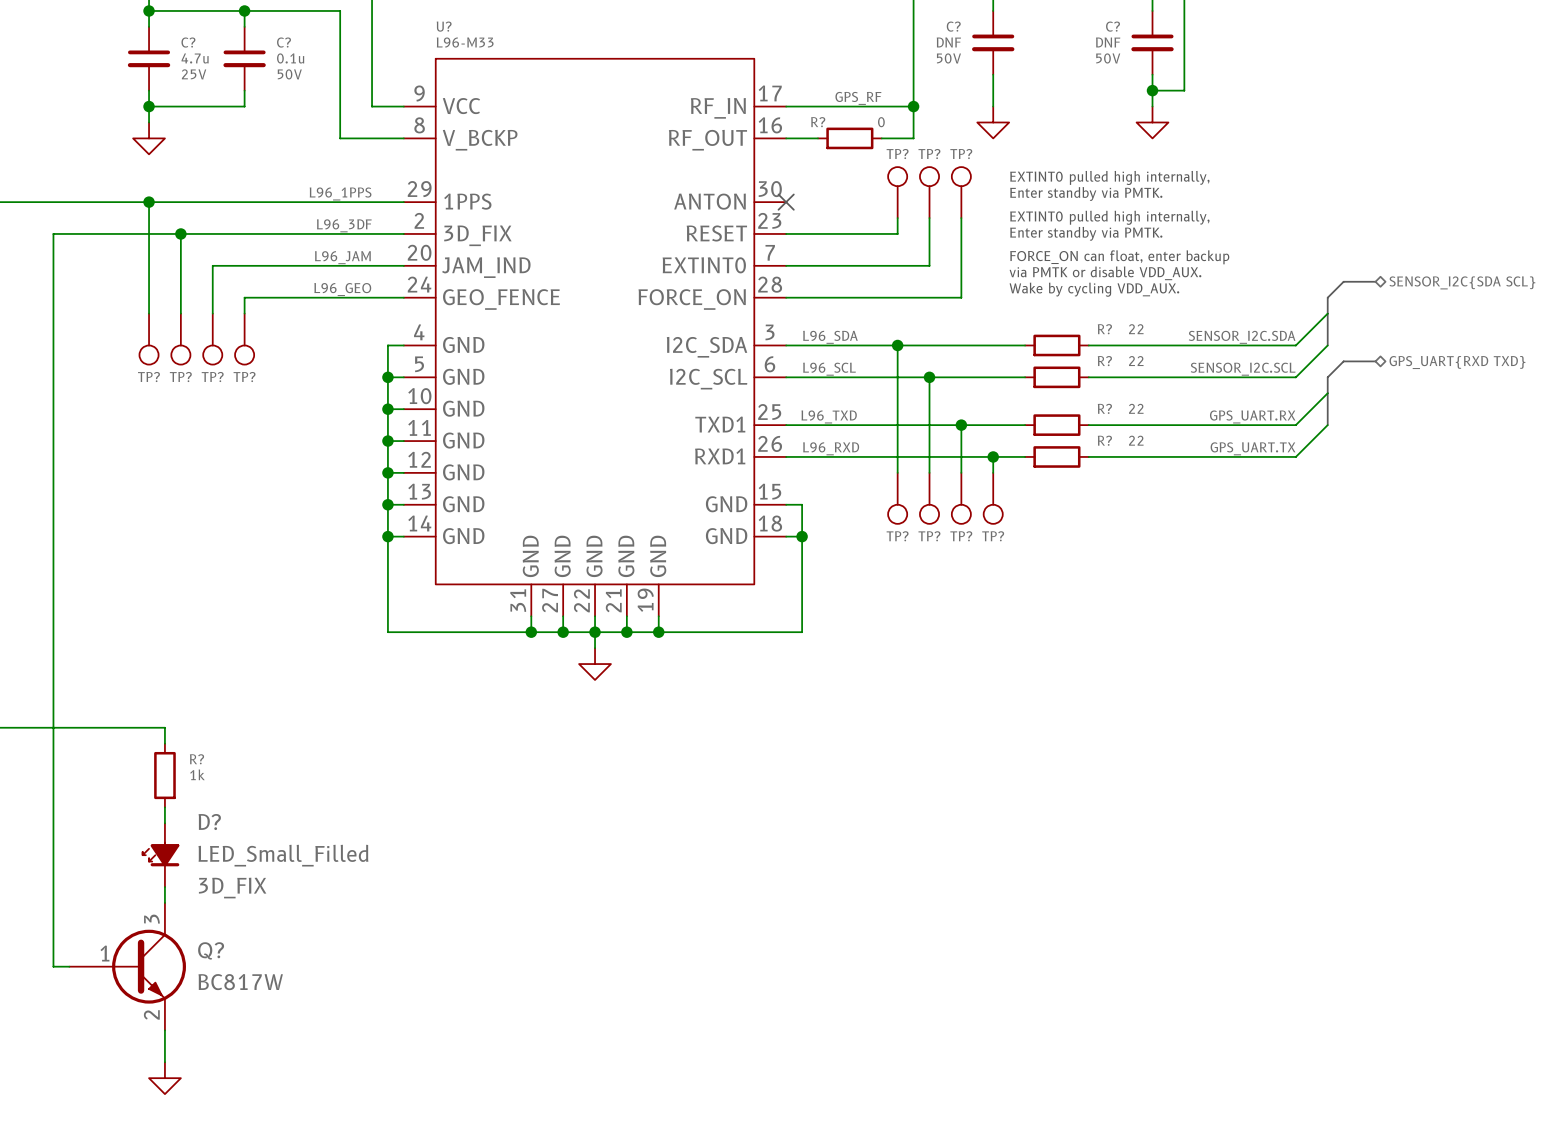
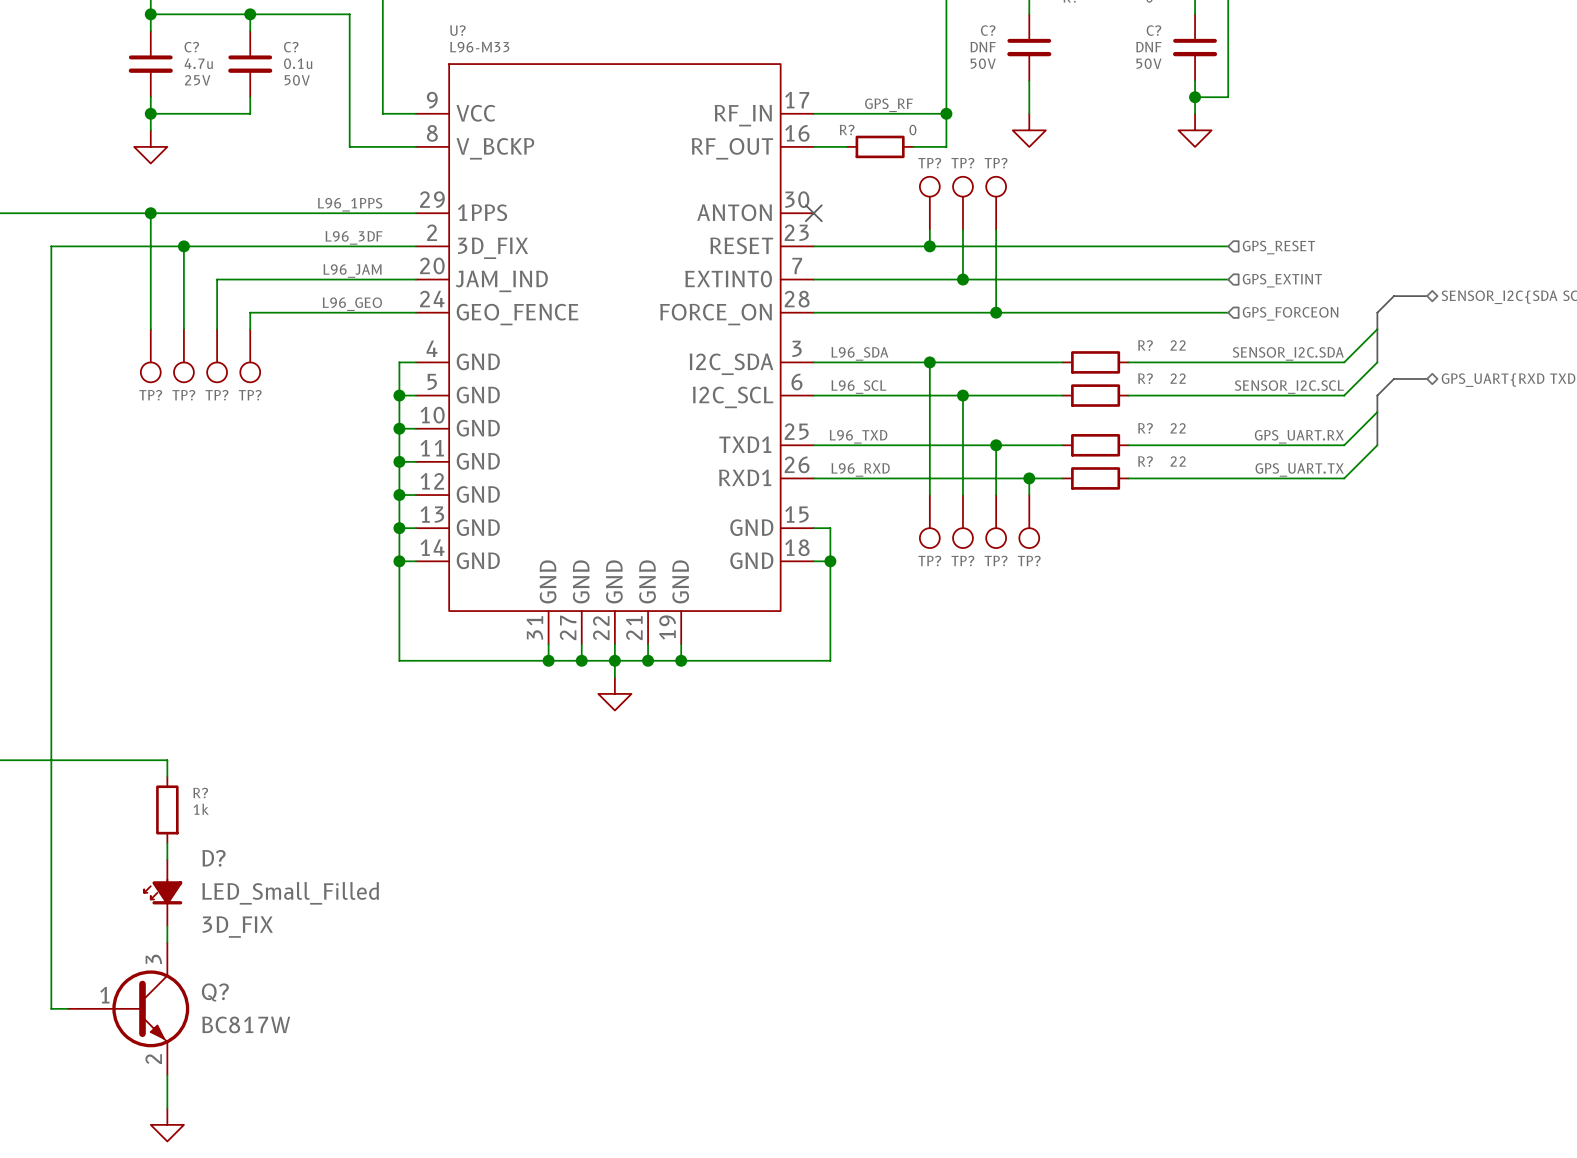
text: EXTINT0 pulled high internally, (1109, 177) -> none
text: Enter standby via PMTK. (1086, 194) -> none
text: EXTINT0 pulled high internally, (1109, 217) -> none
wire: none -> (929, 246) (1228, 246)
junction: none -> (929, 246)
text: Enter standby via PMTK. (1086, 233) -> none
hierarchical label: none -> GPS_RESET (1278, 247)
text: FORCE_ON can float, enter backup (1119, 257) -> none
wire: none -> (962, 279) (1228, 279)
junction: none -> (962, 279)
hierarchical label: none -> GPS_EXTINT (1282, 280)
text: via PMTK or disable VDD_AUX. (1105, 273) -> none
text: Wake by cycling VDD_AUX. (1094, 289) -> none
wire: none -> (996, 312) (1228, 312)
junction: none -> (996, 312)
hierarchical label: none -> GPS_FORCEON (1290, 313)

